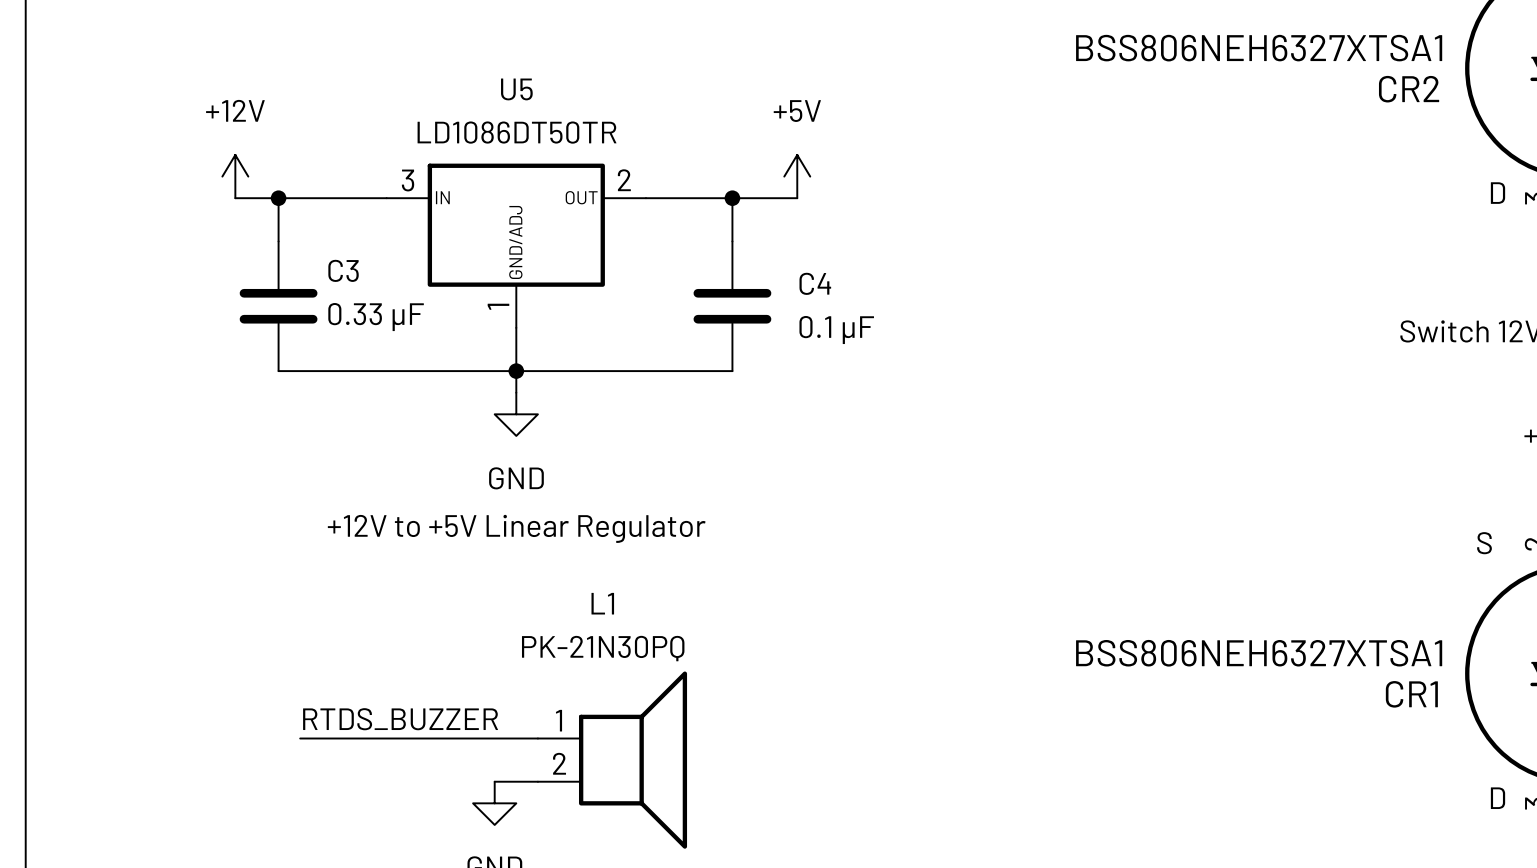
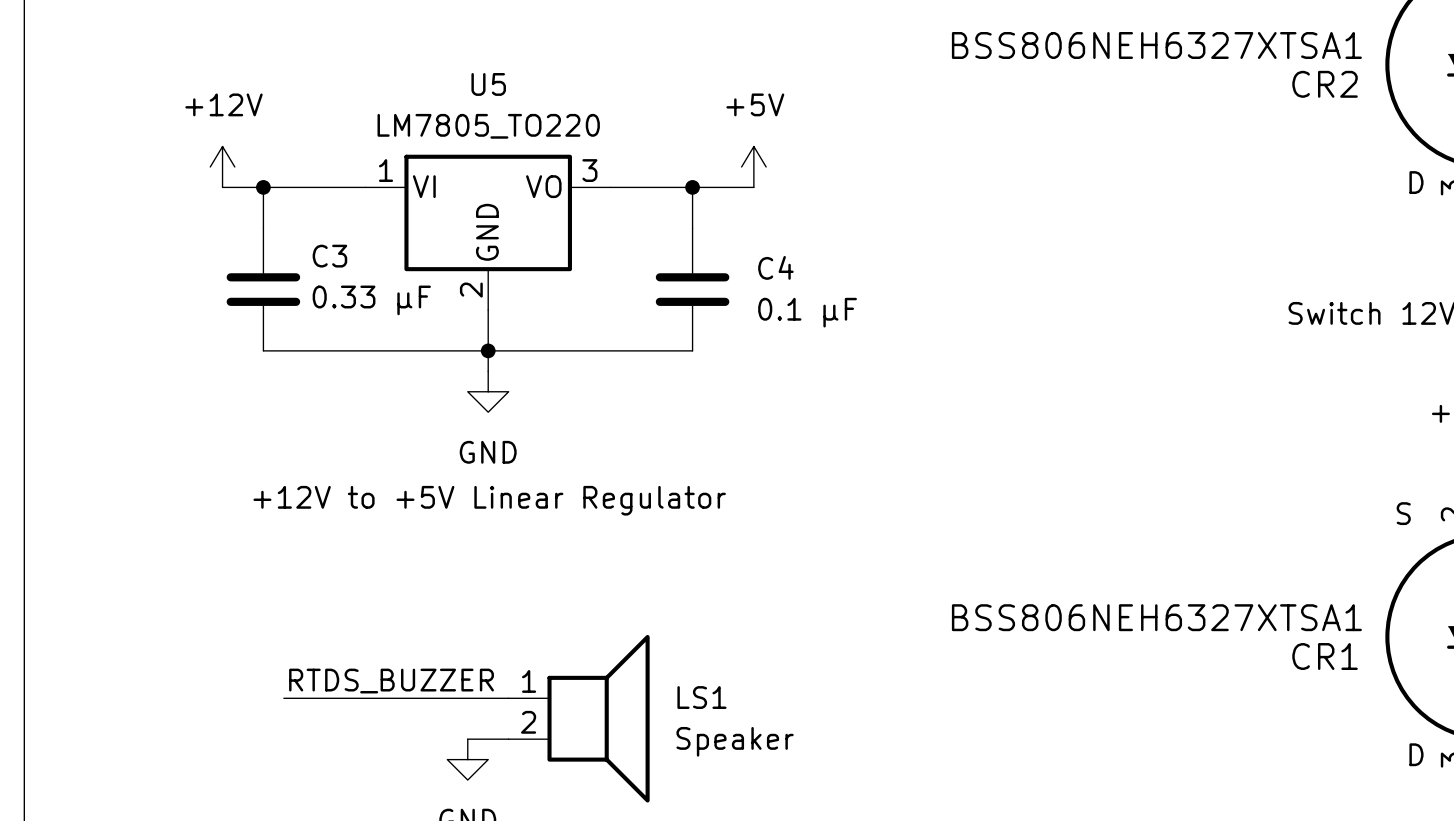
U5 value: LD1086DT50TR (517, 132) -> LM7805_TO220 (488, 126)
U5 pin number: 3 (408, 180) -> 1 (386, 170)
U5 pin number: 2 (624, 180) -> 3 (589, 170)
U5 pin name: IN (442, 197) -> VI (424, 186)
U5 pin name: OUT (581, 197) -> VO (543, 186)
U5 pin name: GND/ADJ (515, 242) -> GND (487, 232)
U5 pin number: 1 (498, 306) -> 2 (471, 290)
L1 name: L1 (602, 603) -> LS1 (701, 697)
L1 value: PK-21N30PQ (603, 648) -> Speaker (735, 741)

